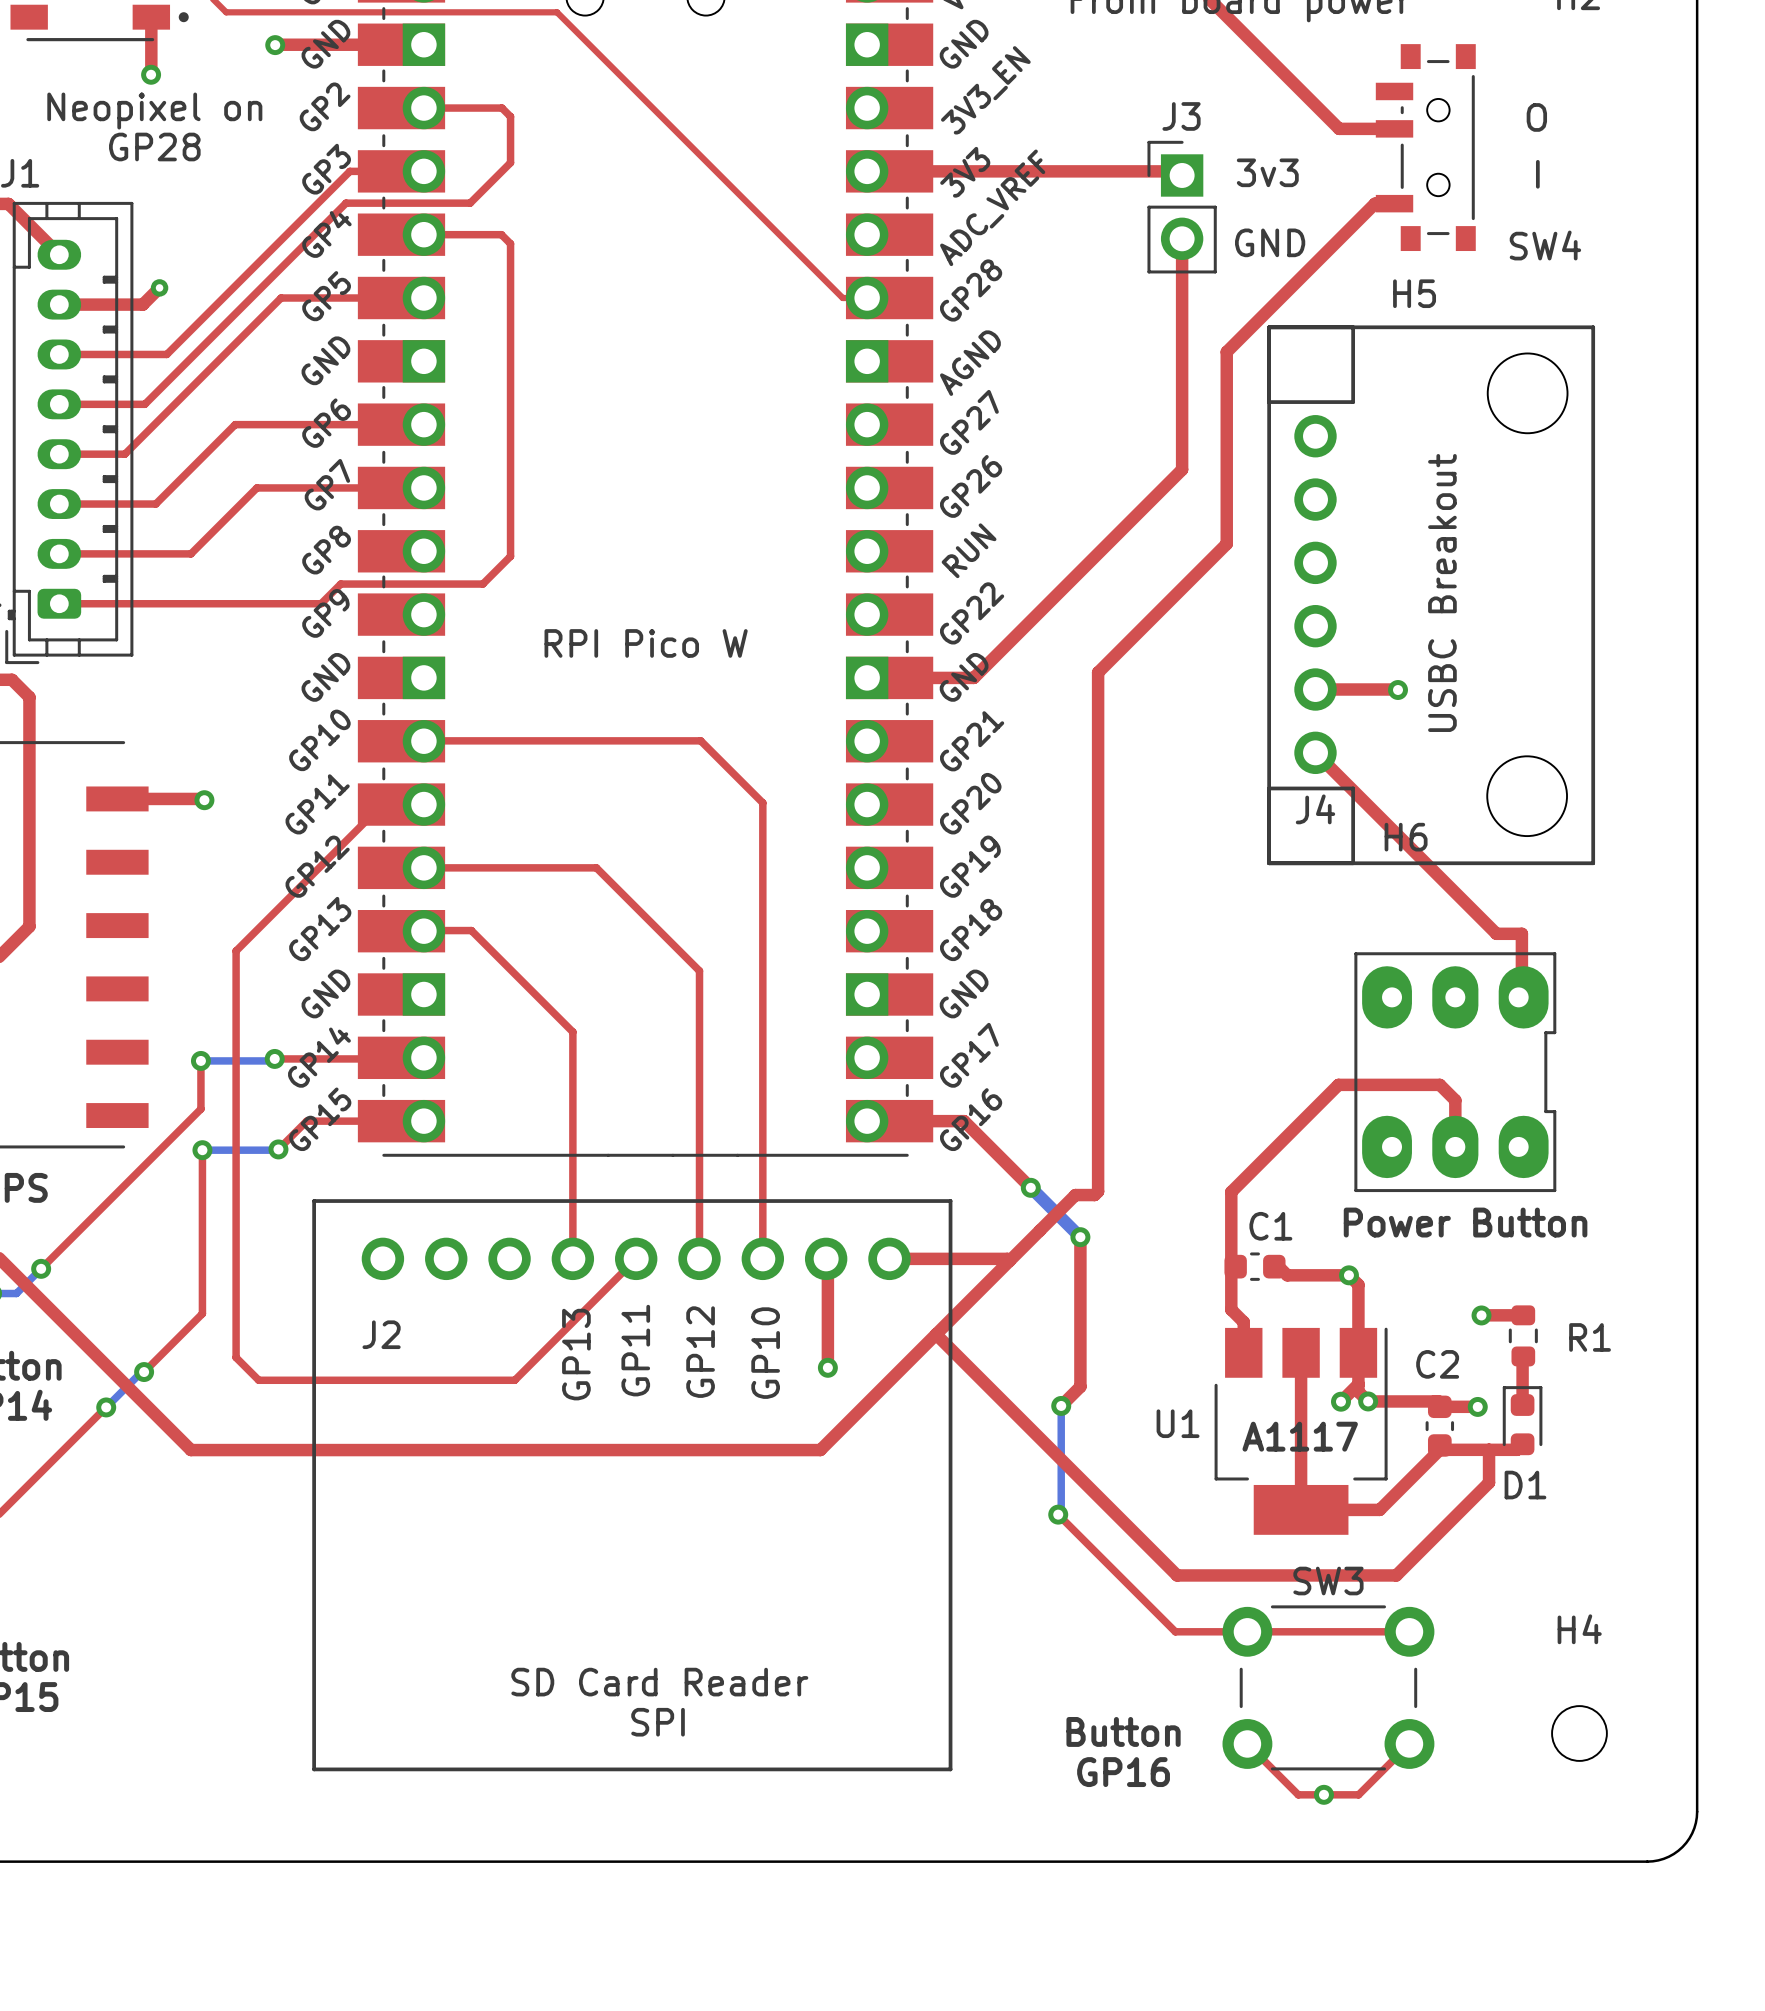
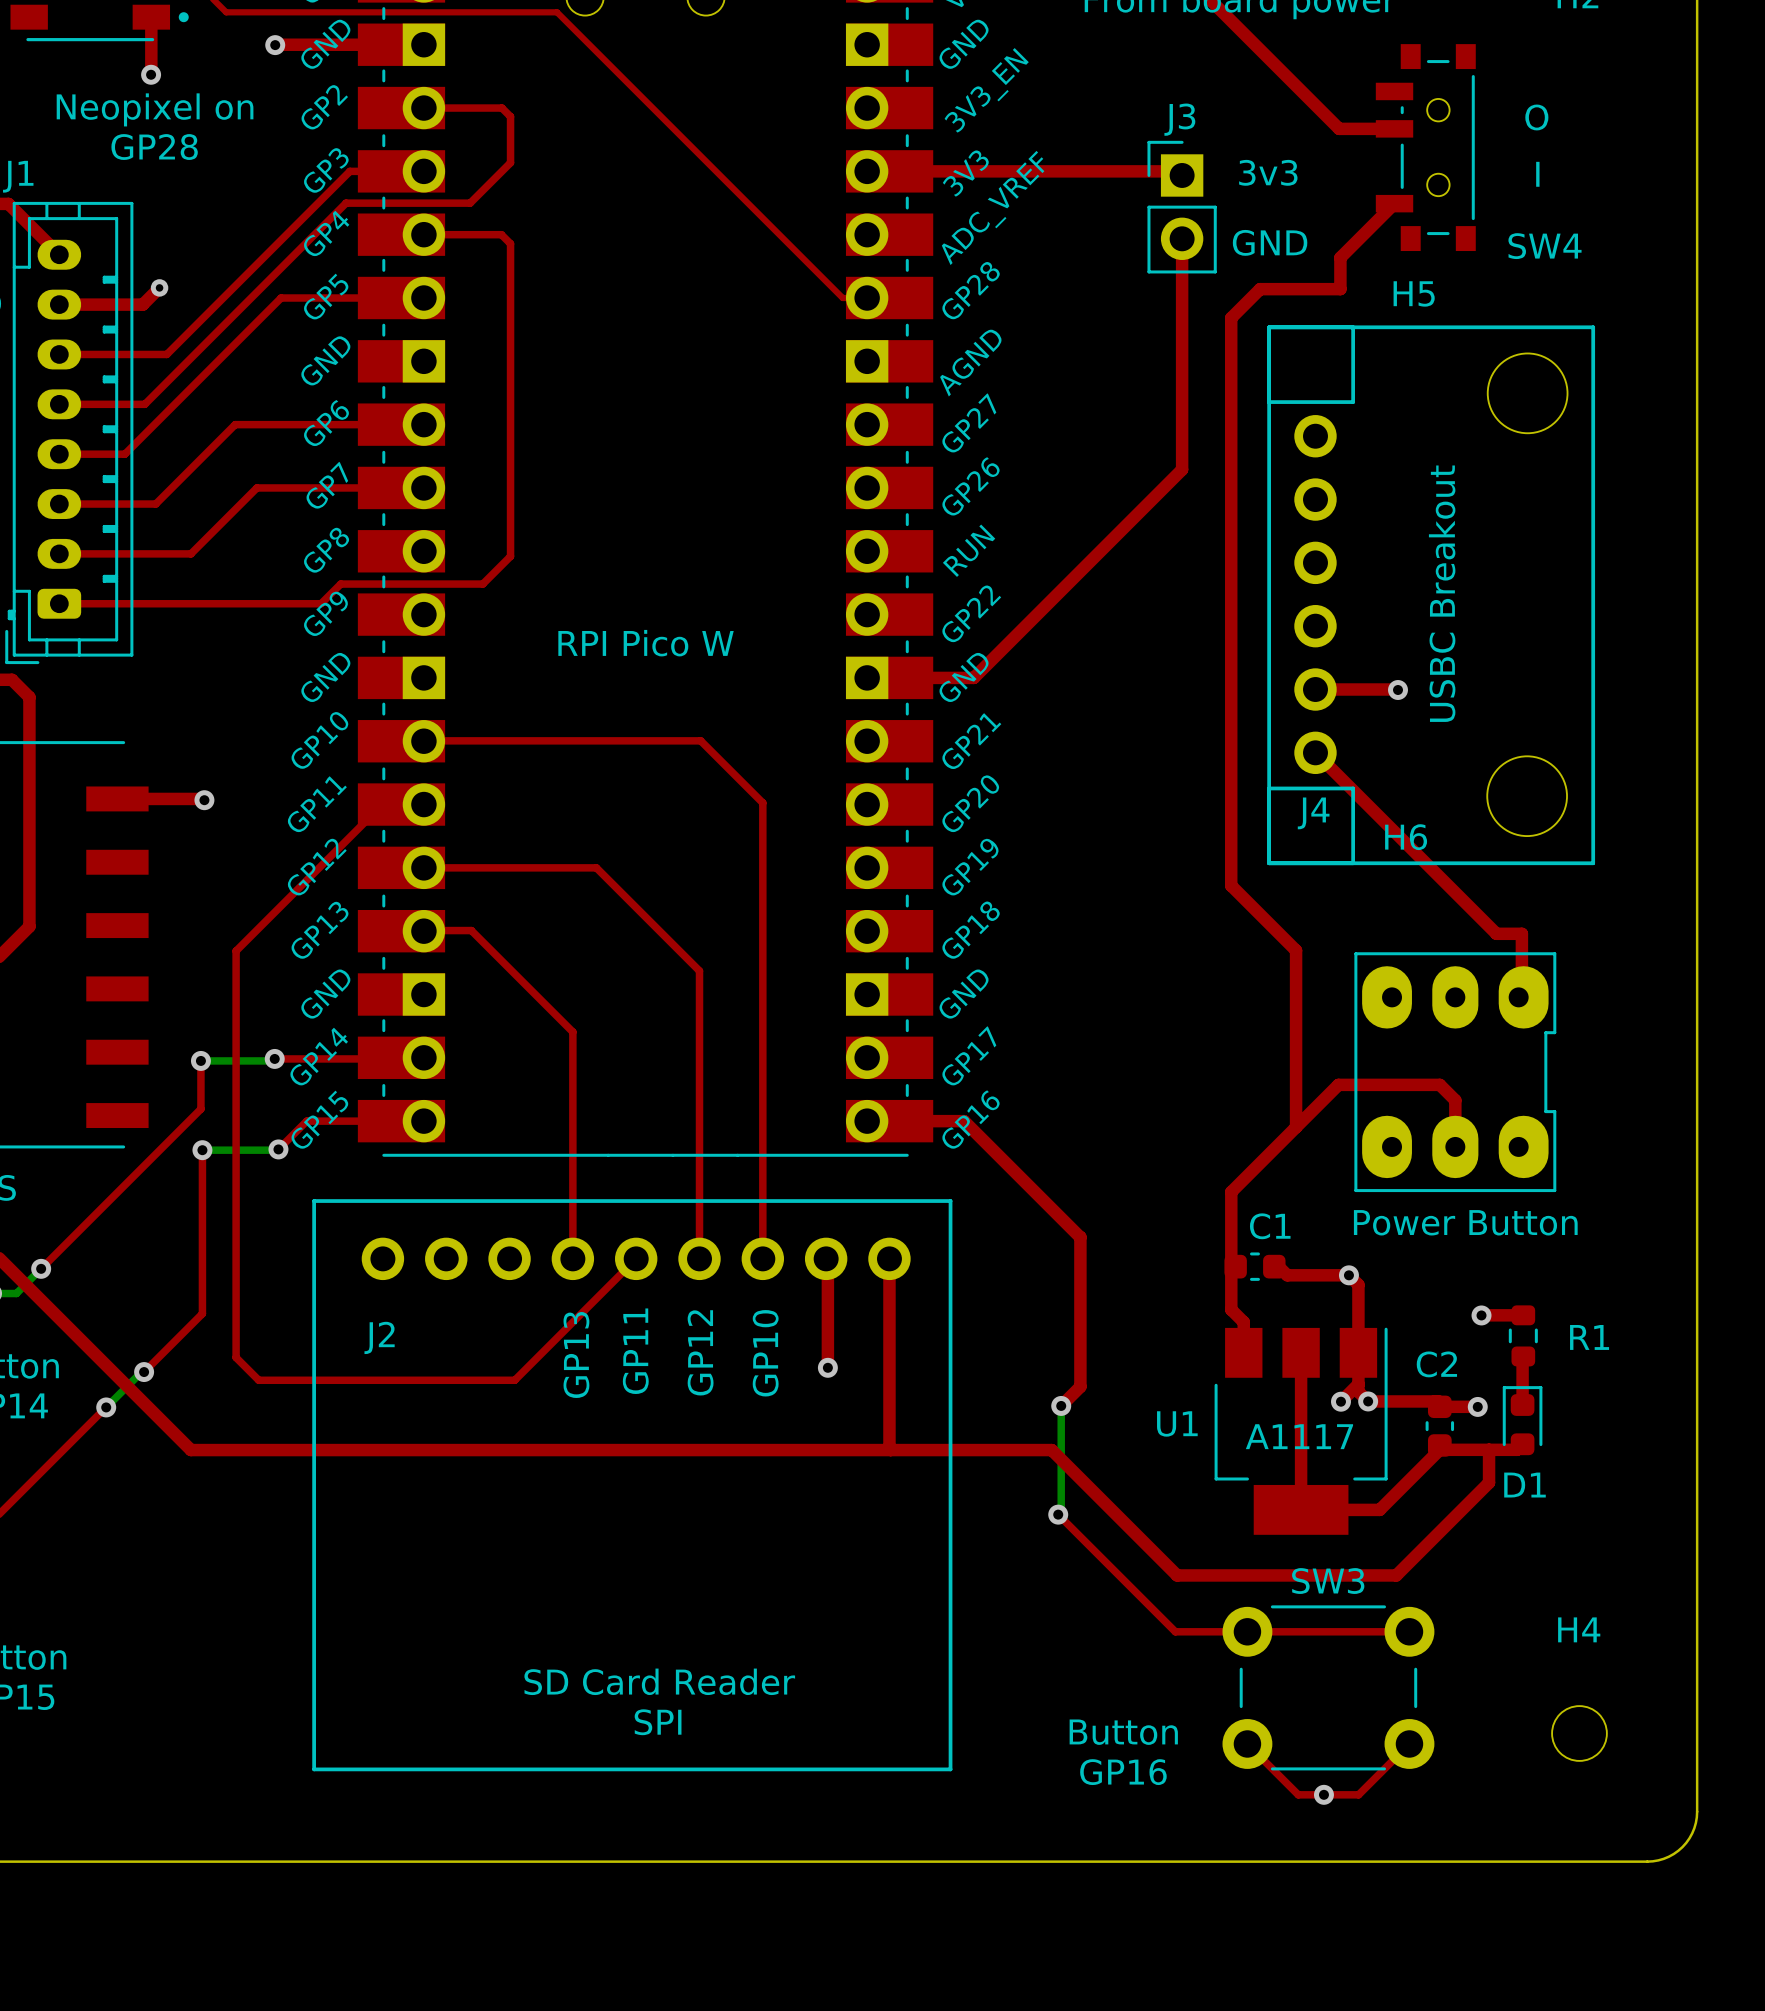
top track: (1394, 203) (1375, 203) (1226, 351) (1226, 543) (1098, 672) (1098, 1191) (1094, 1195) (1075, 1195) (820, 1450) -> (1394, 203) (1340, 257) (1340, 289) (1260, 289) (1231, 318) (1231, 885) (1296, 950) (1296, 1127)
top track: none -> (1030, 1187) (1080, 1237)
via: (1030, 1187) -> none
bottom track: (1031, 1187) (1080, 1237) -> none
via: (1080, 1237) -> none
top track: (889, 1258) (1007, 1258) (1009, 1260) -> (889, 1258) (890, 1450)
top track: (936, 1334) (1051, 1450) -> (820, 1450) (1051, 1450)

